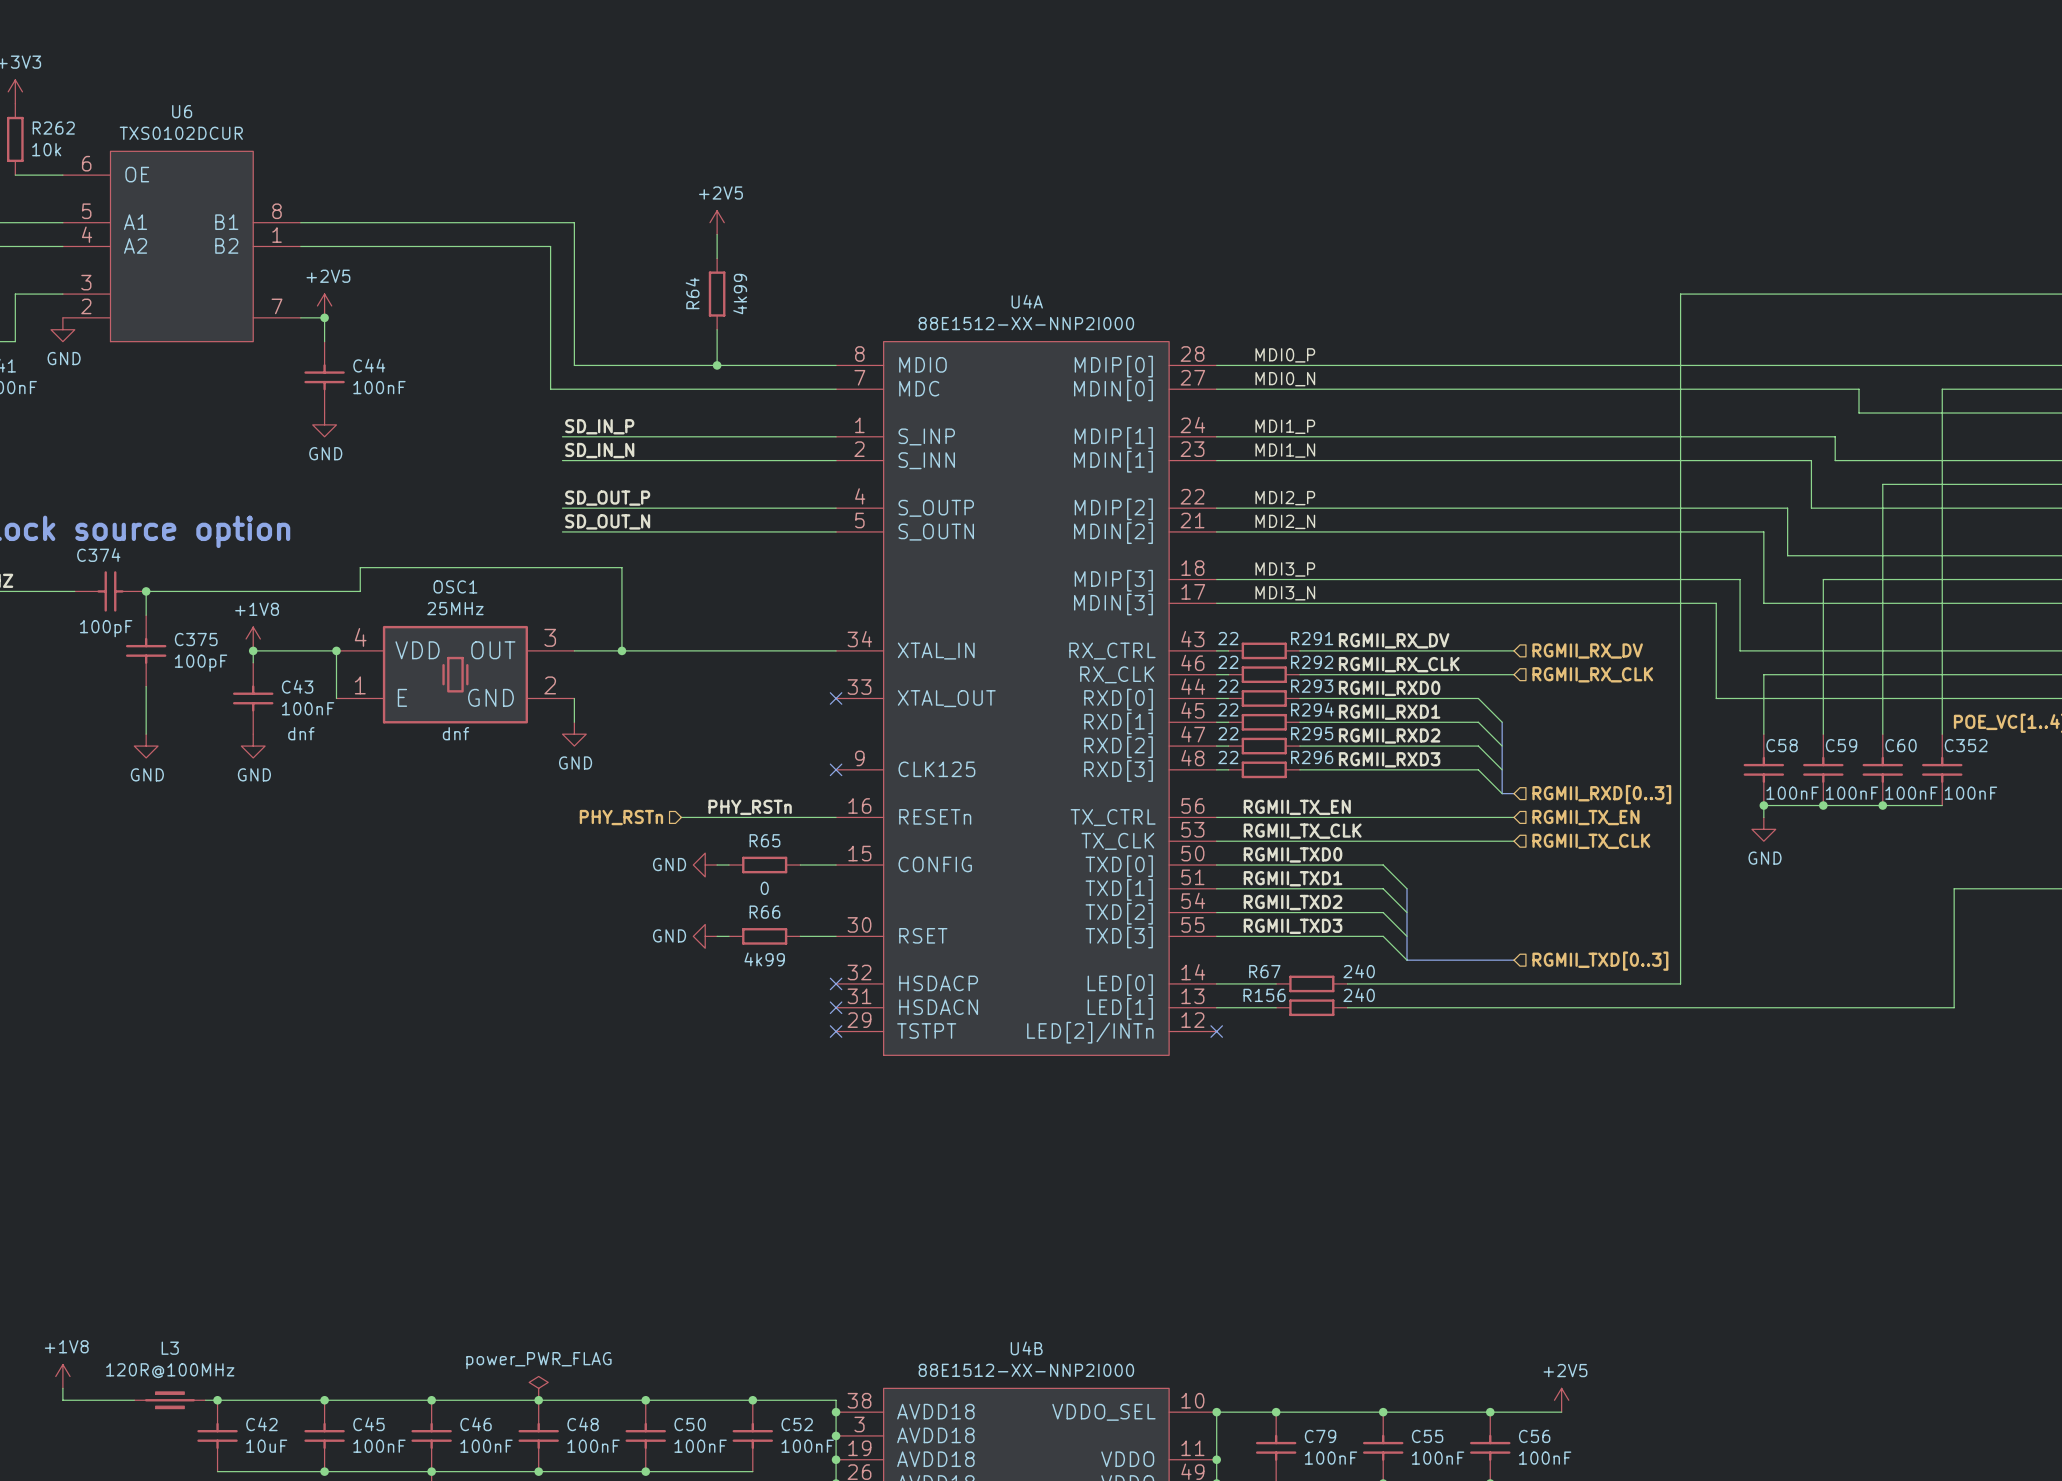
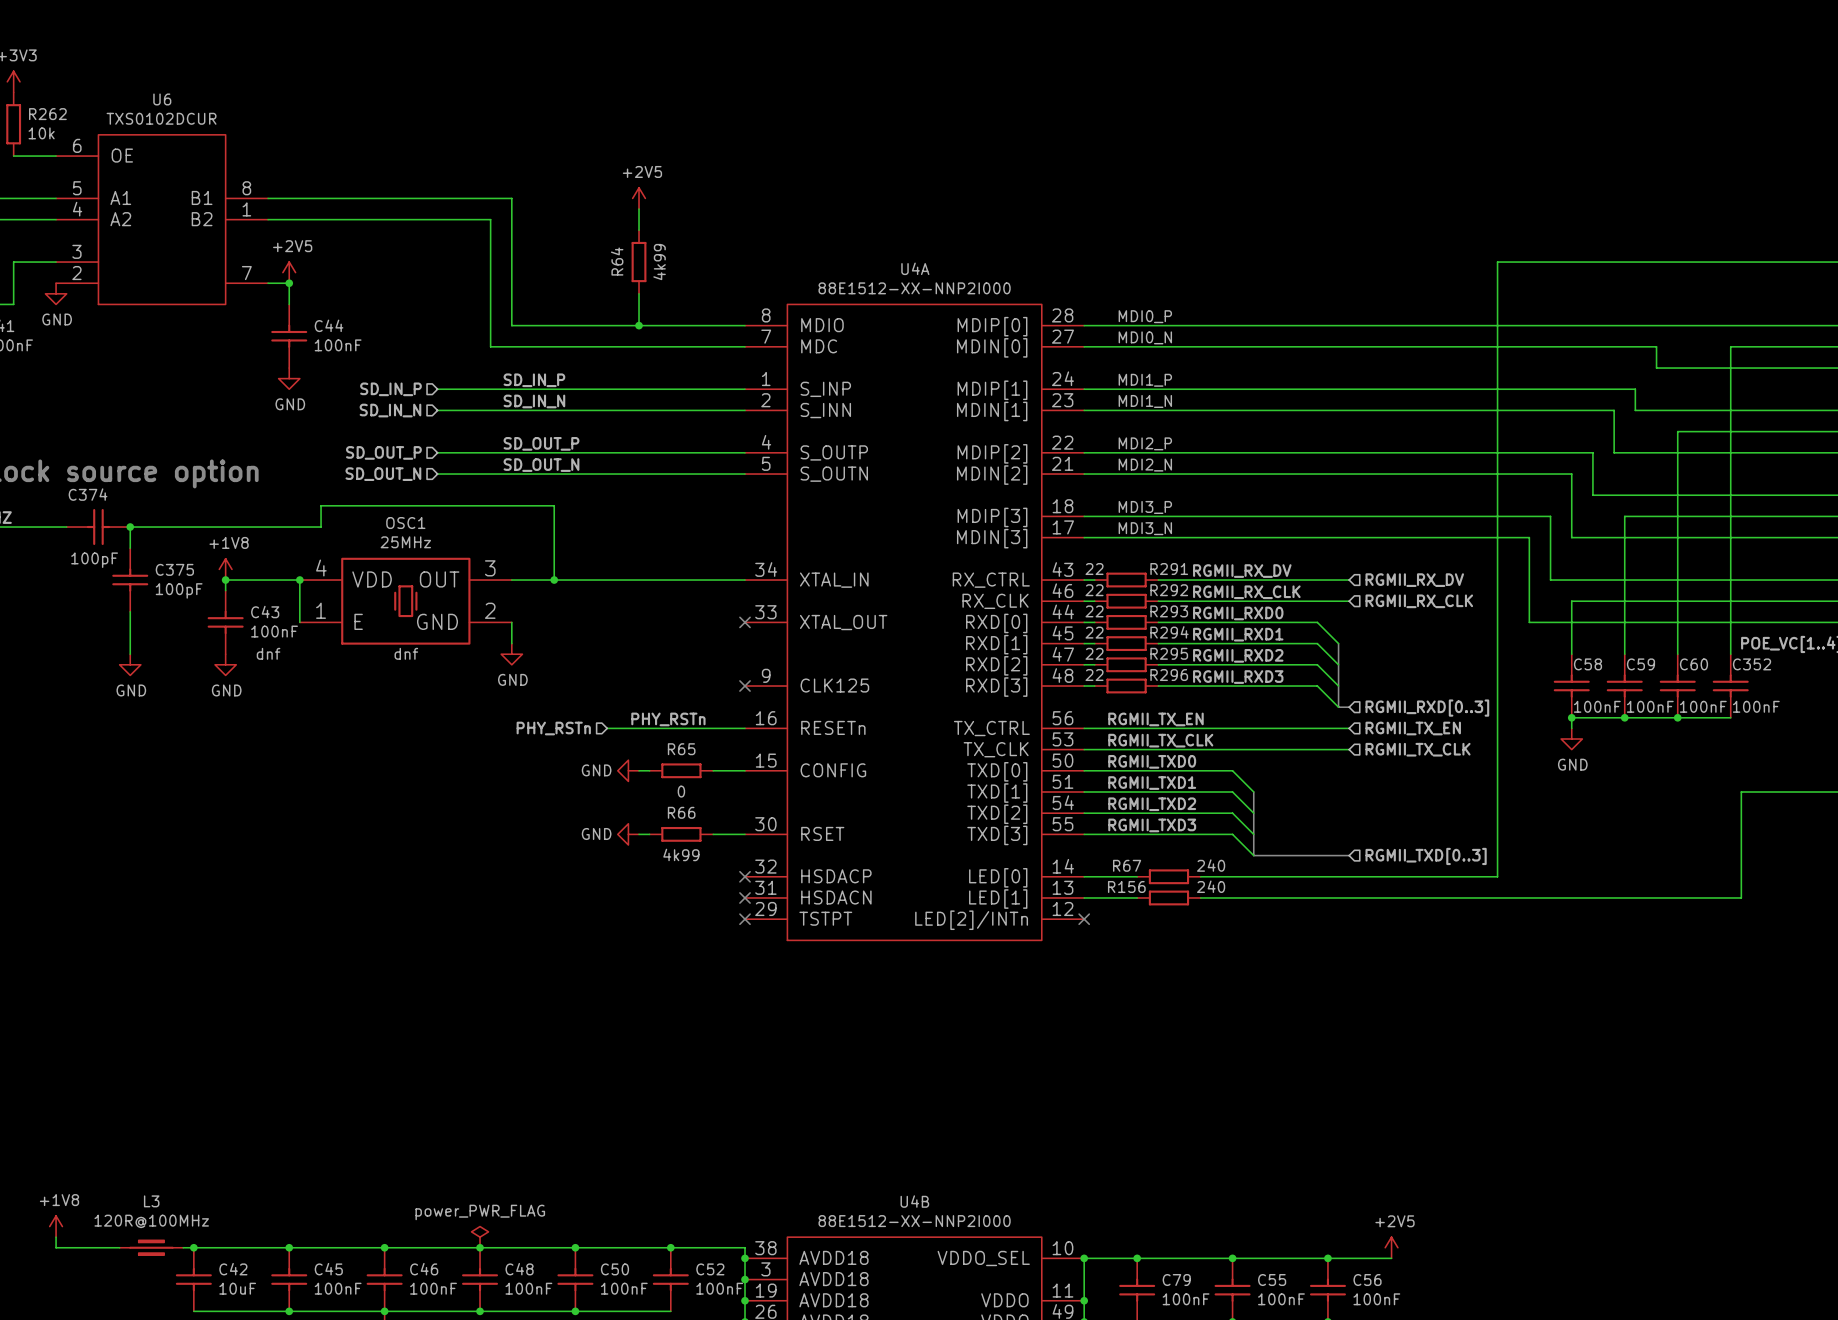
hierarchical label: none -> SD_IN_P (390, 389)
wire: none -> (437, 389) (501, 389)
hierarchical label: none -> SD_IN_N (390, 410)
wire: none -> (437, 410) (501, 410)
hierarchical label: none -> SD_OUT_P (383, 452)
wire: none -> (437, 452) (501, 452)
wire: none -> (437, 474) (501, 474)
hierarchical label: none -> SD_OUT_N (383, 474)

